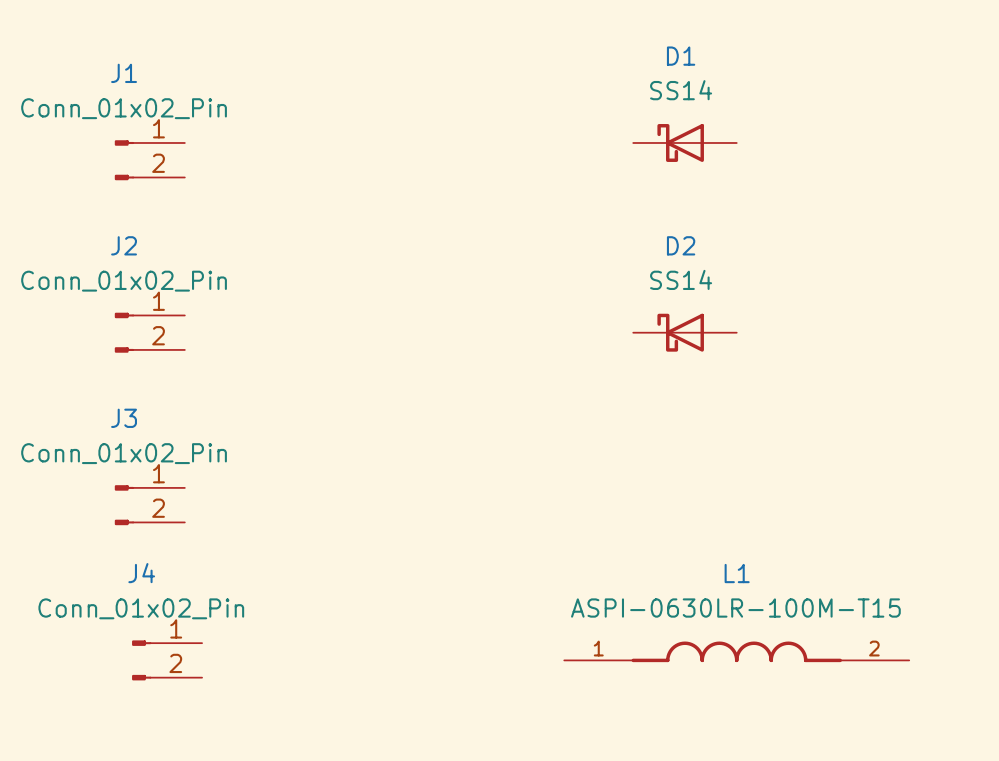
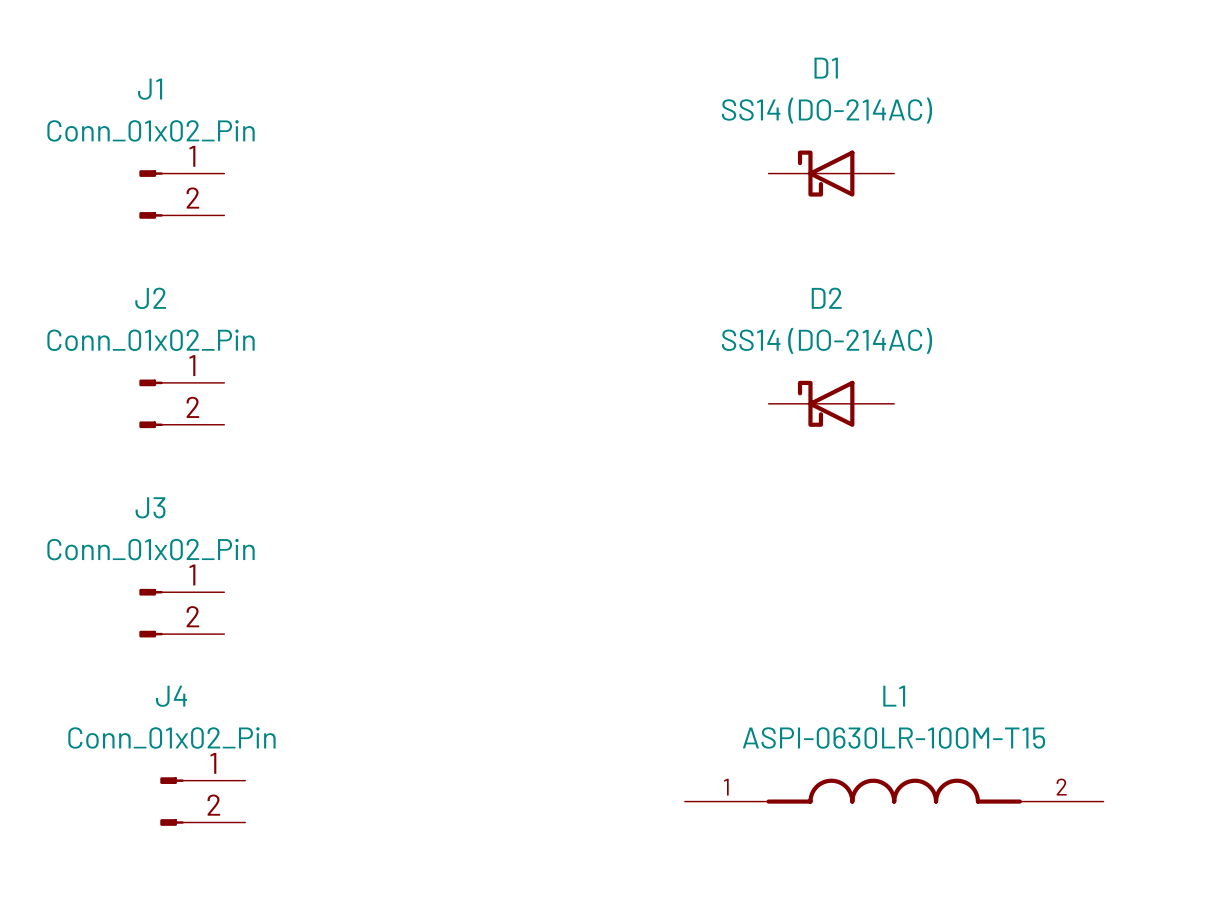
D1 value: SS14 (681, 90) -> SS14 (DO-214AC) (827, 110)
D2 value: SS14 (681, 279) -> SS14 (DO-214AC) (827, 340)

